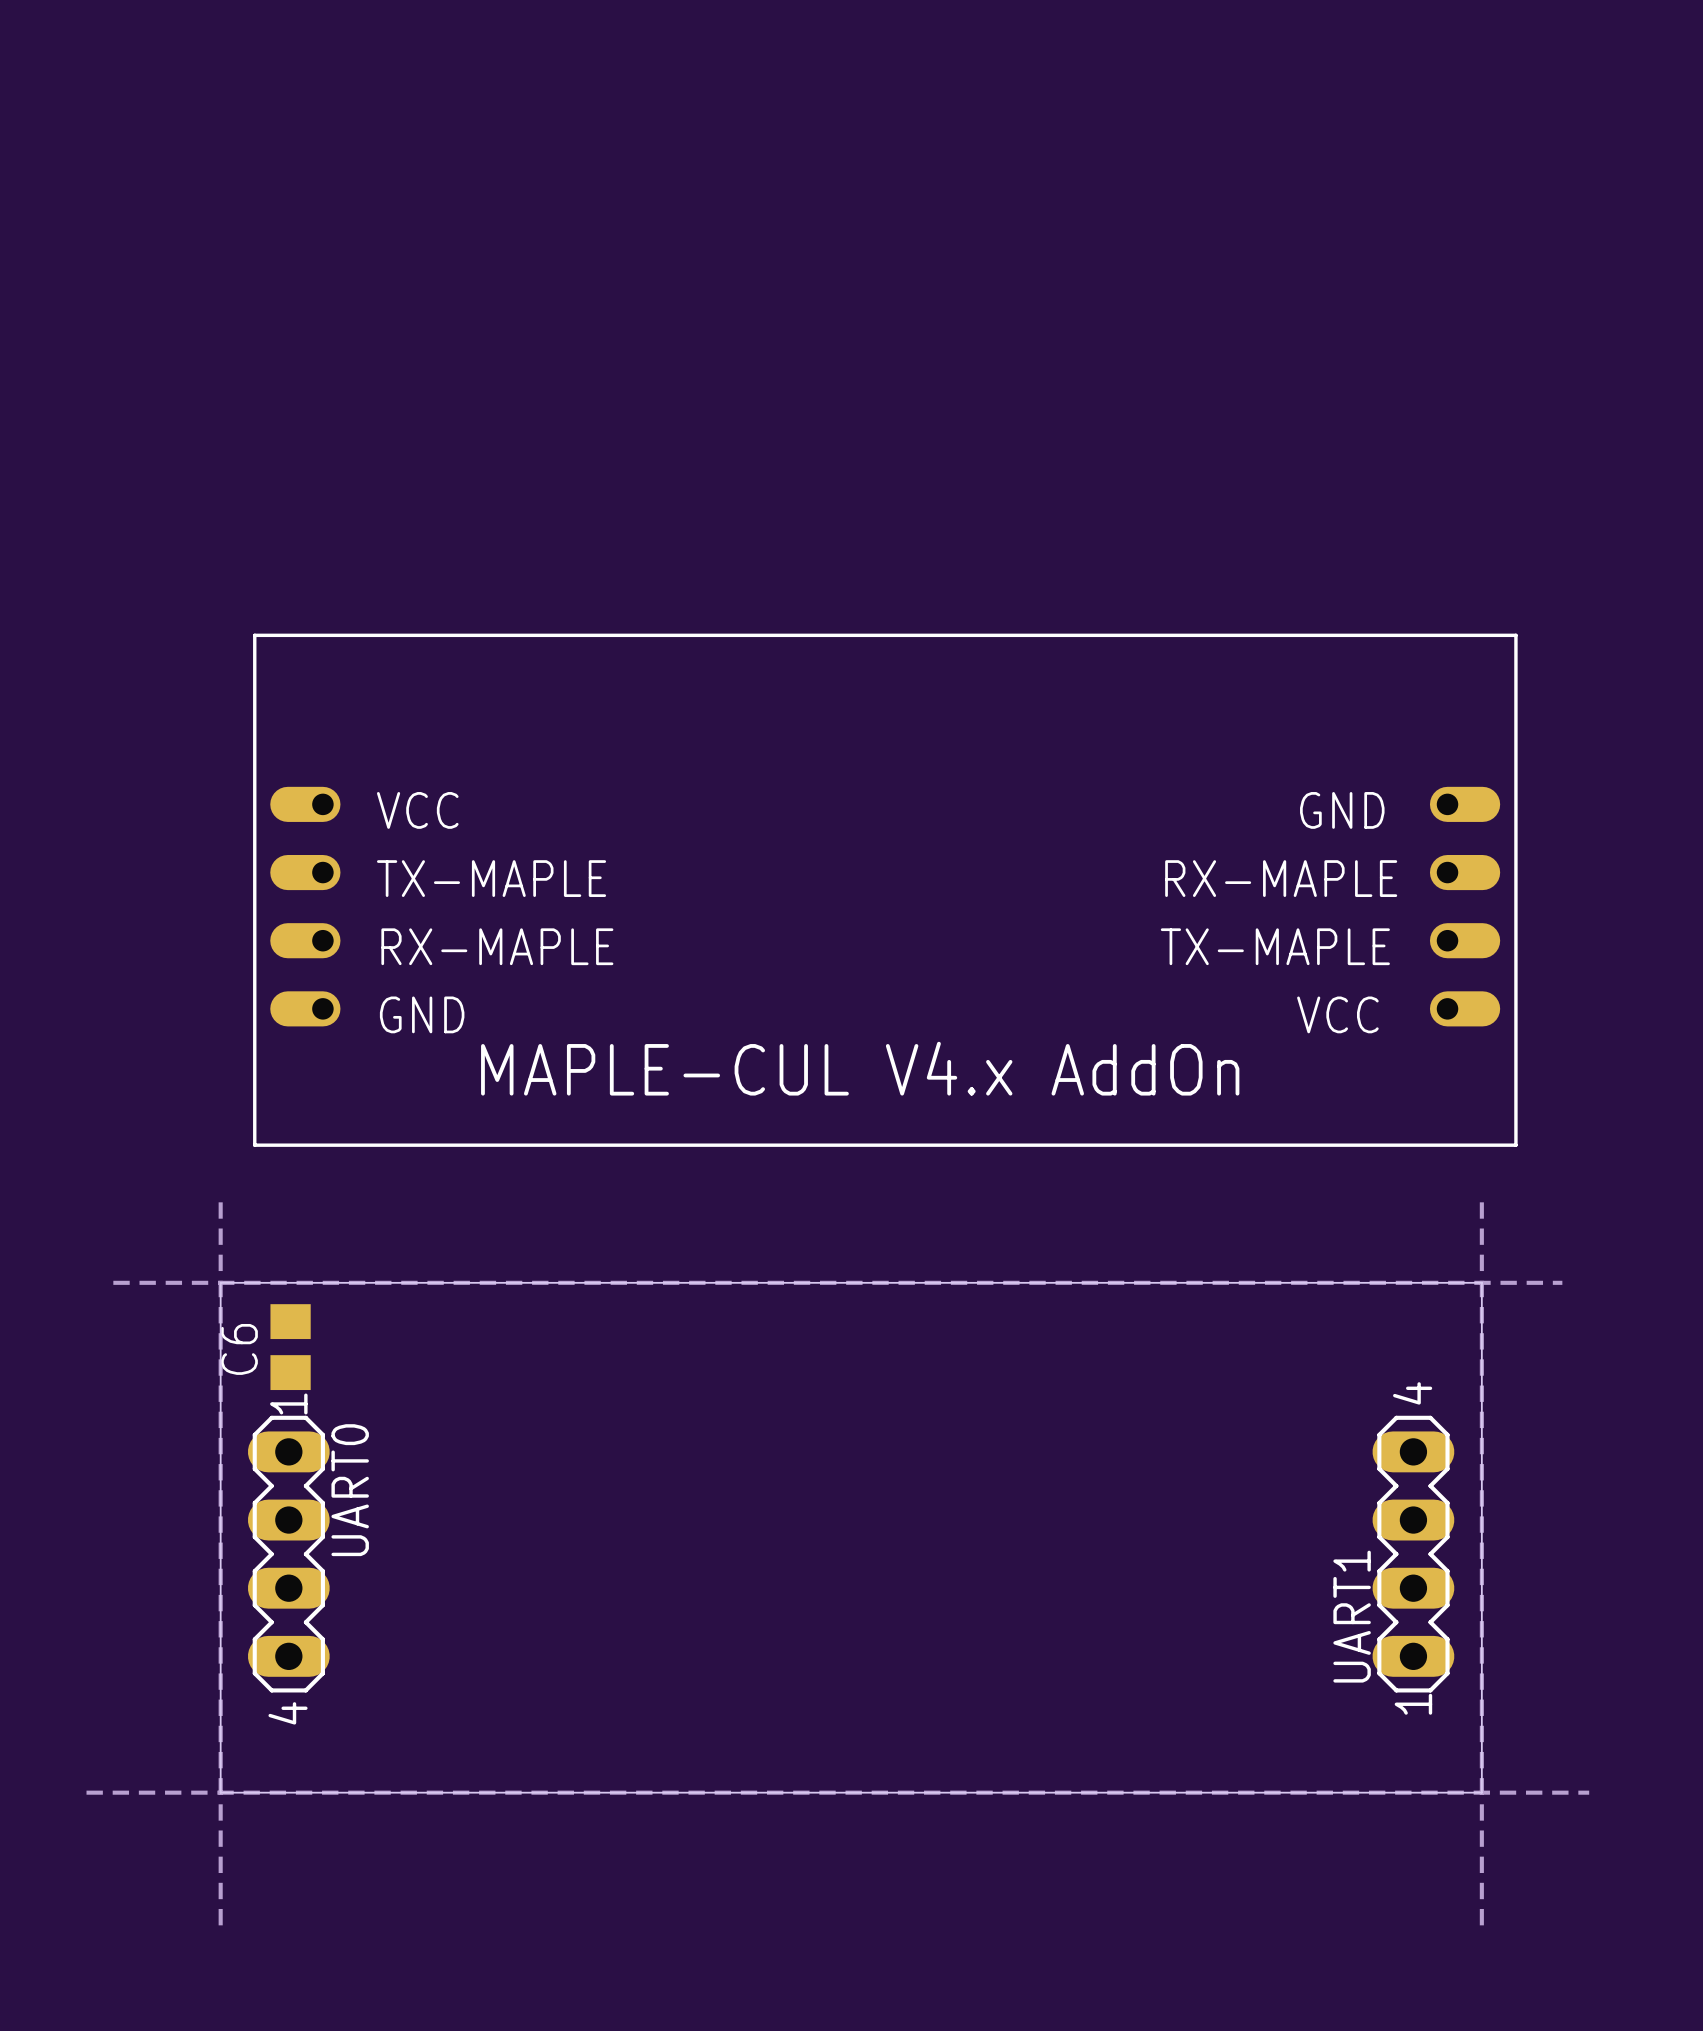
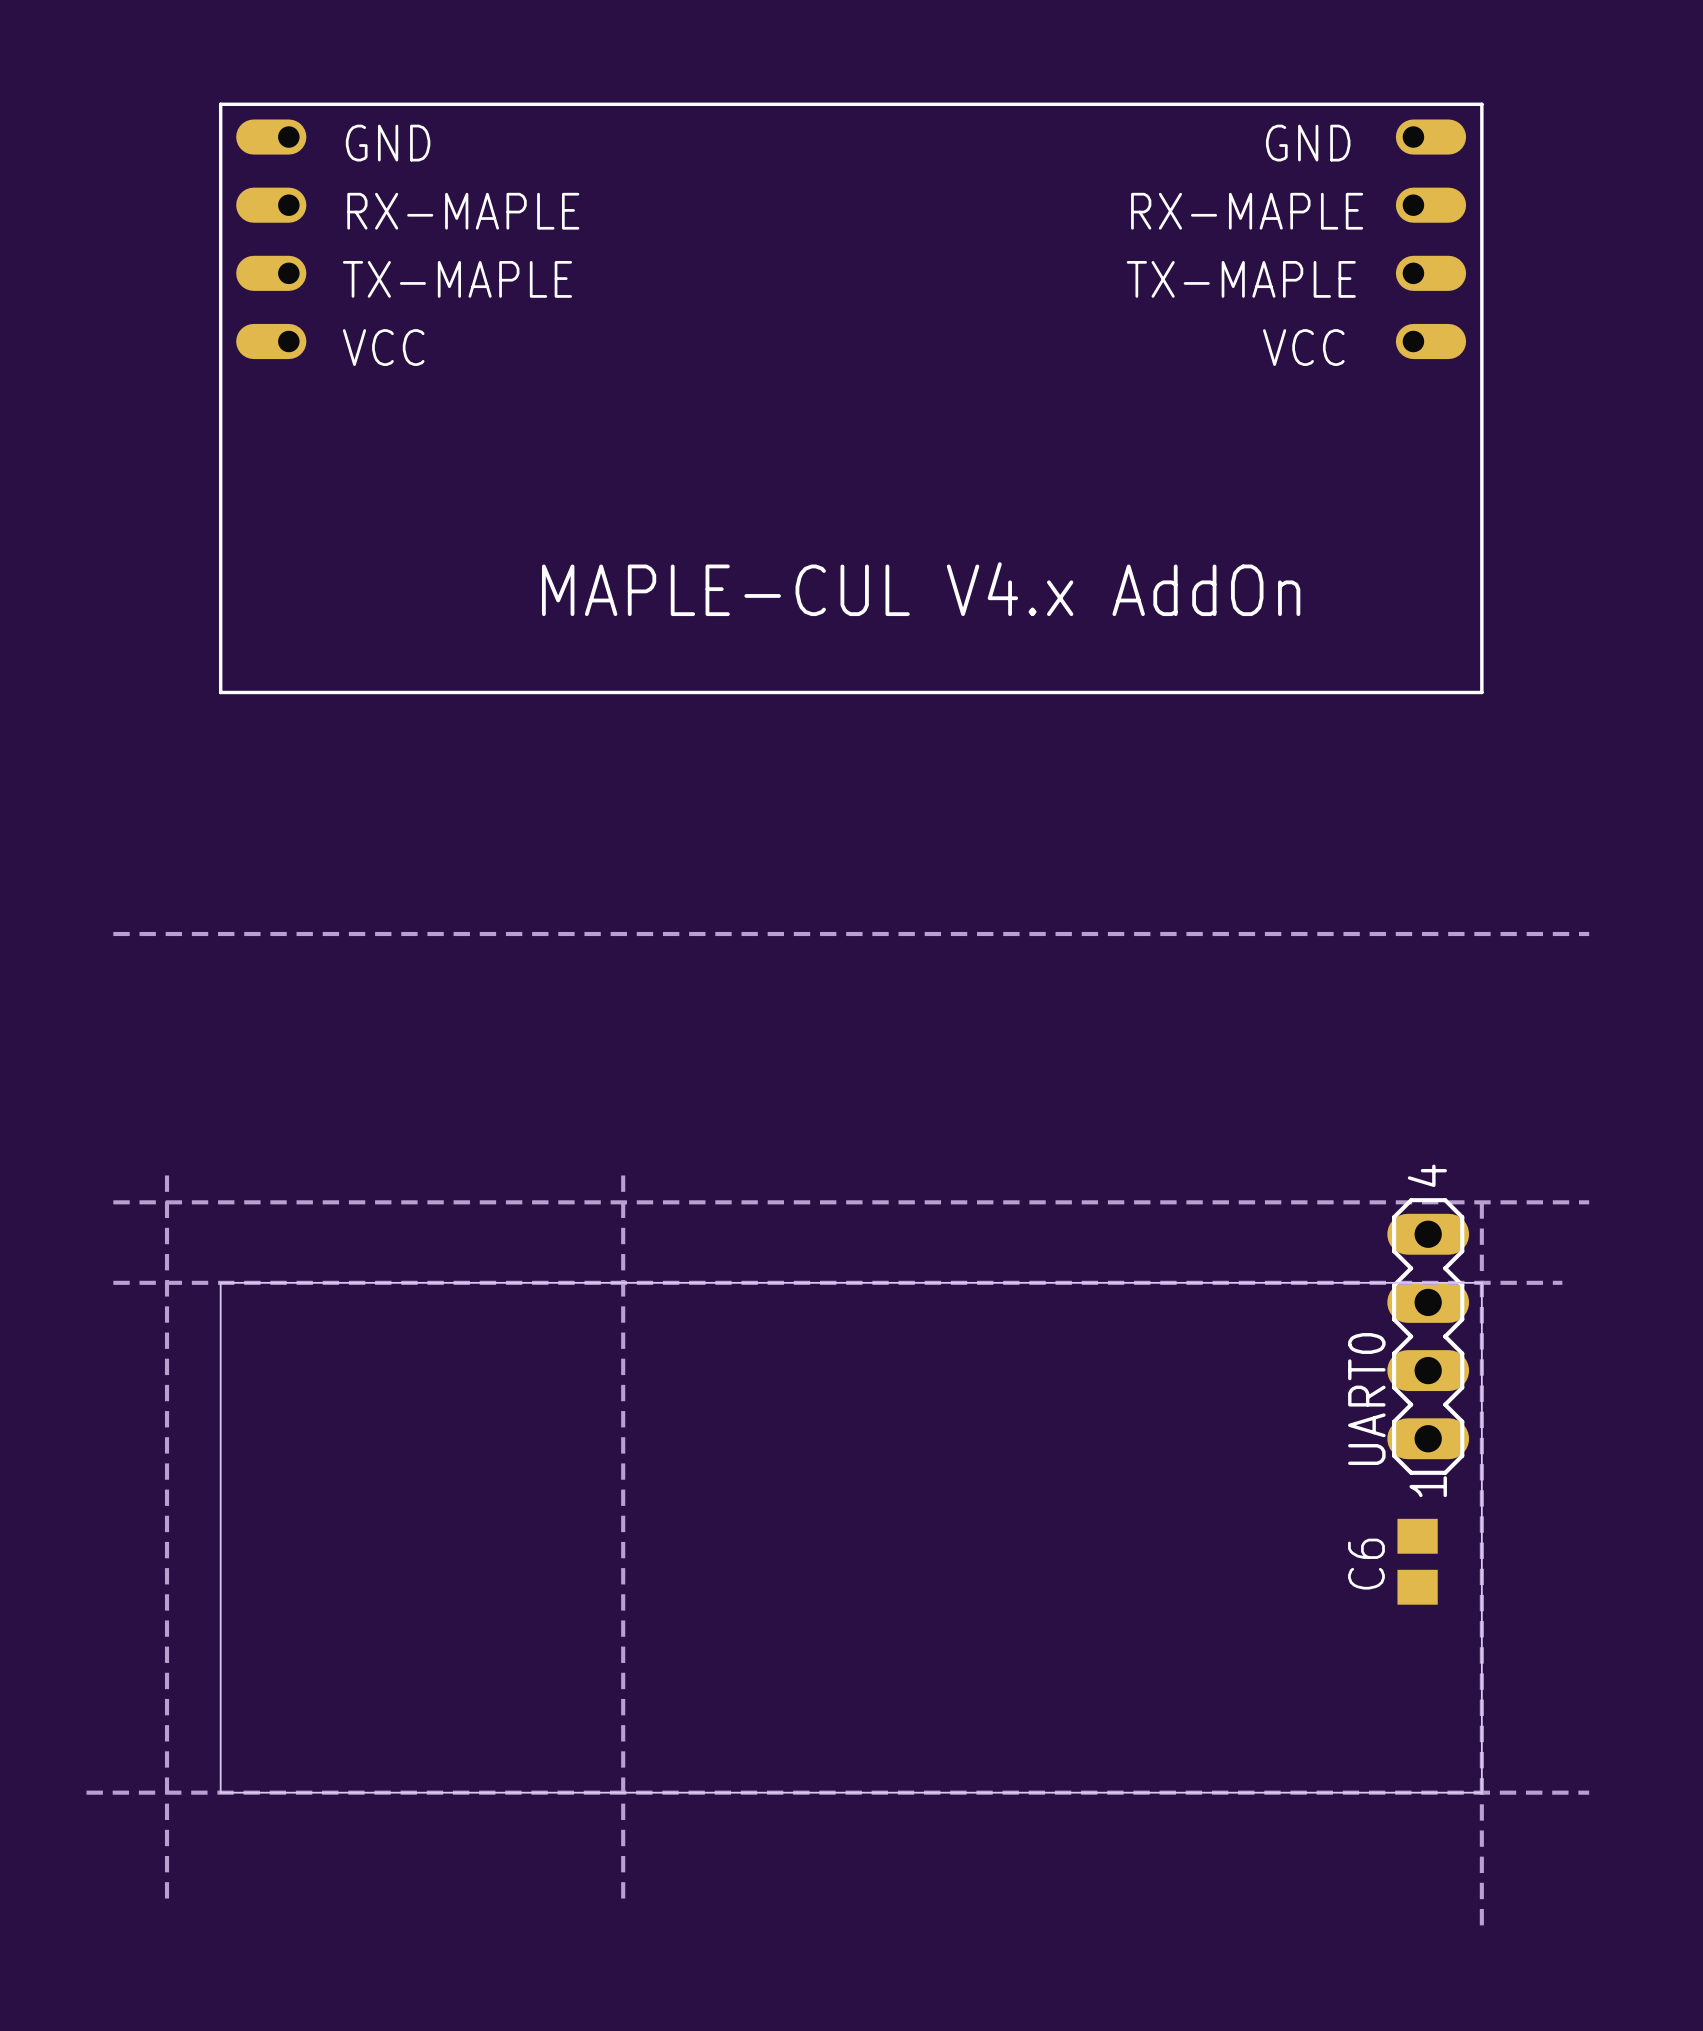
part: none -> (851, 398)
part: (885, 890) -> none
line: none -> (113, 933) (1589, 933)
line: none -> (623, 1175) (623, 1900)
line: none -> (113, 1202) (1589, 1202)
line: (220, 1202) (220, 1926) -> (167, 1175) (167, 1900)
C6 position: (290, 1347) -> (1417, 1561)
UART0 text position: 1 (288, 1403) -> 1 (1428, 1486)
UART0 name position: UART0 (350, 1490) -> UART0 (1366, 1399)
UART0 position: (288, 1554) -> (1428, 1336)
UART1: (1413, 1554) -> none
UART0 text position: 4 (288, 1713) -> 4 (1427, 1175)

